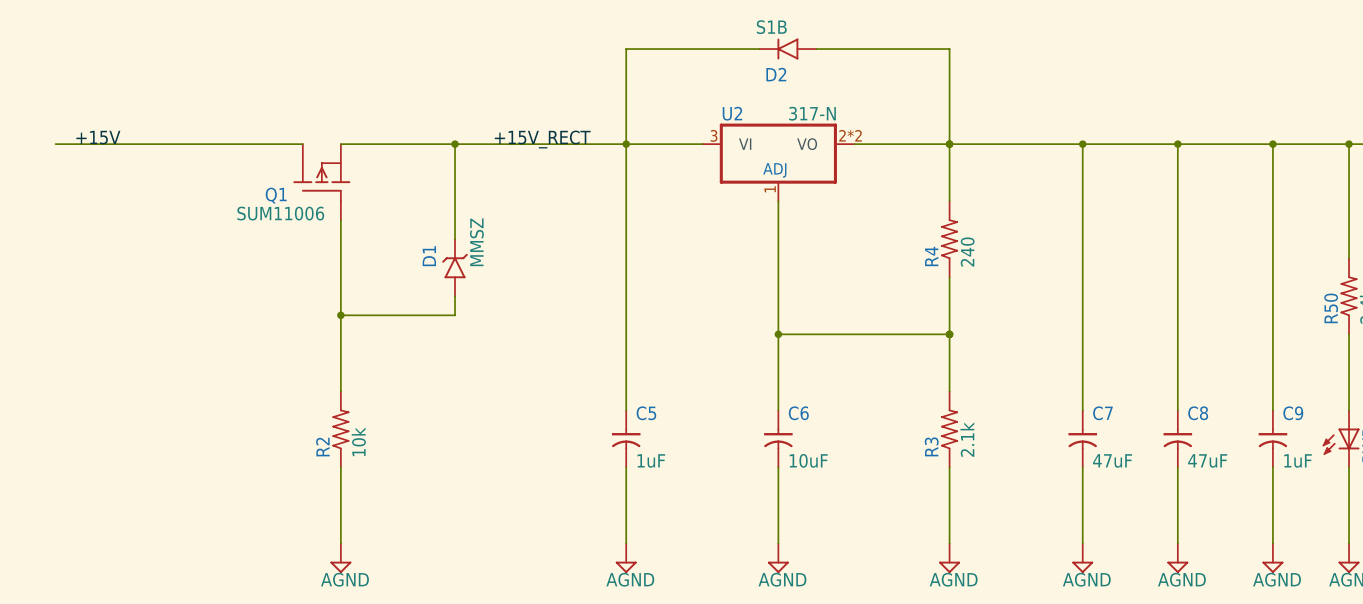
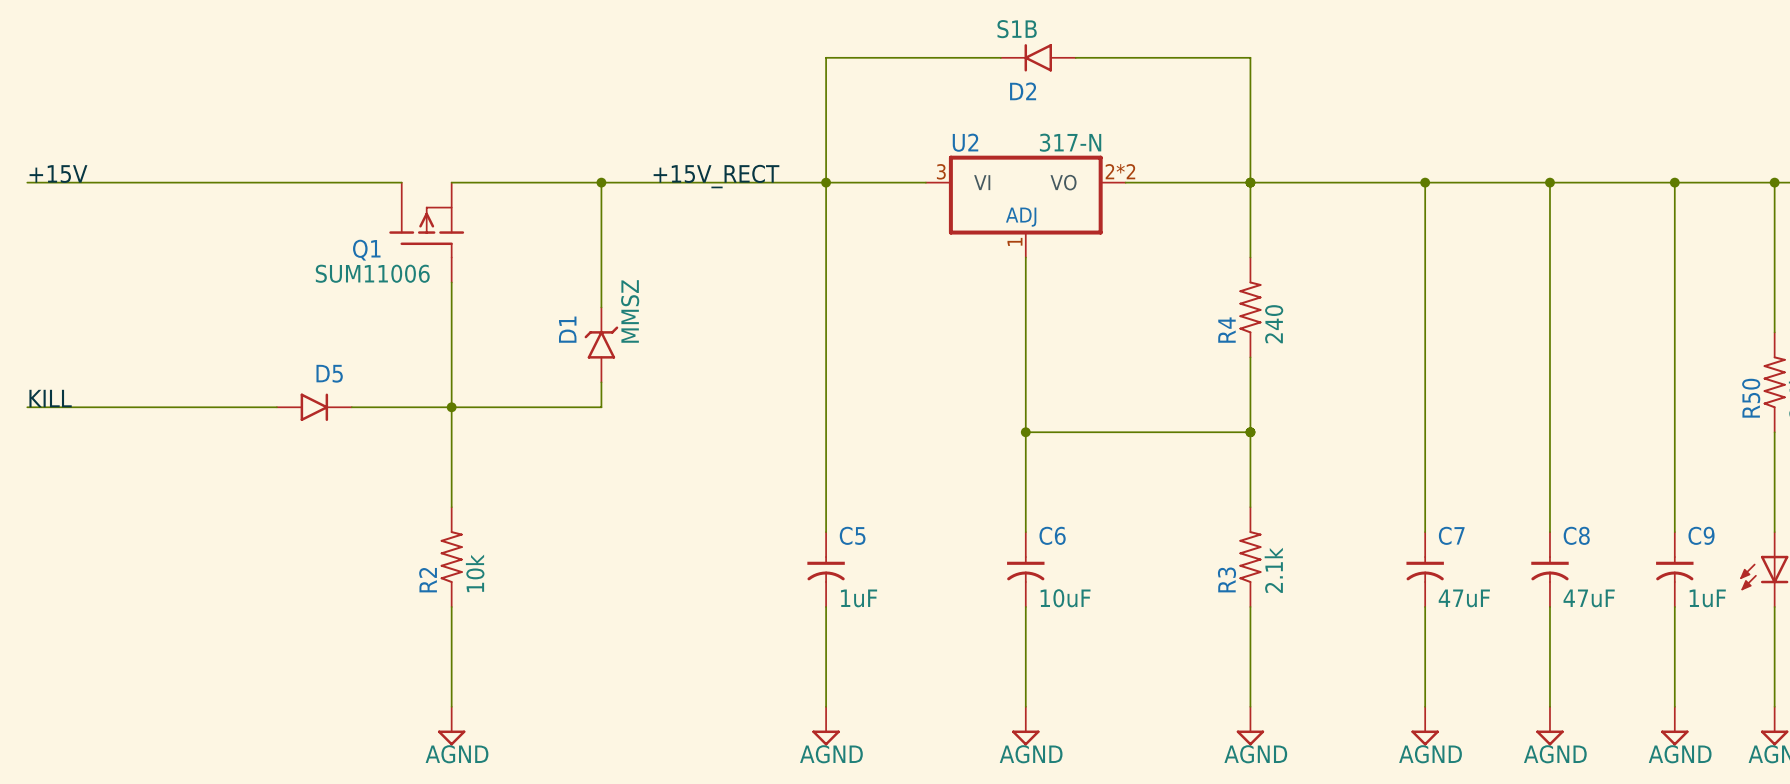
label position: +15V (98, 137) -> +15V (58, 174)
wire: none -> (27, 182) (77, 182)
label: none -> KILL (50, 398)
wire: none -> (27, 407) (276, 407)
D5: none -> (314, 407)
wire: none -> (351, 407) (451, 407)

